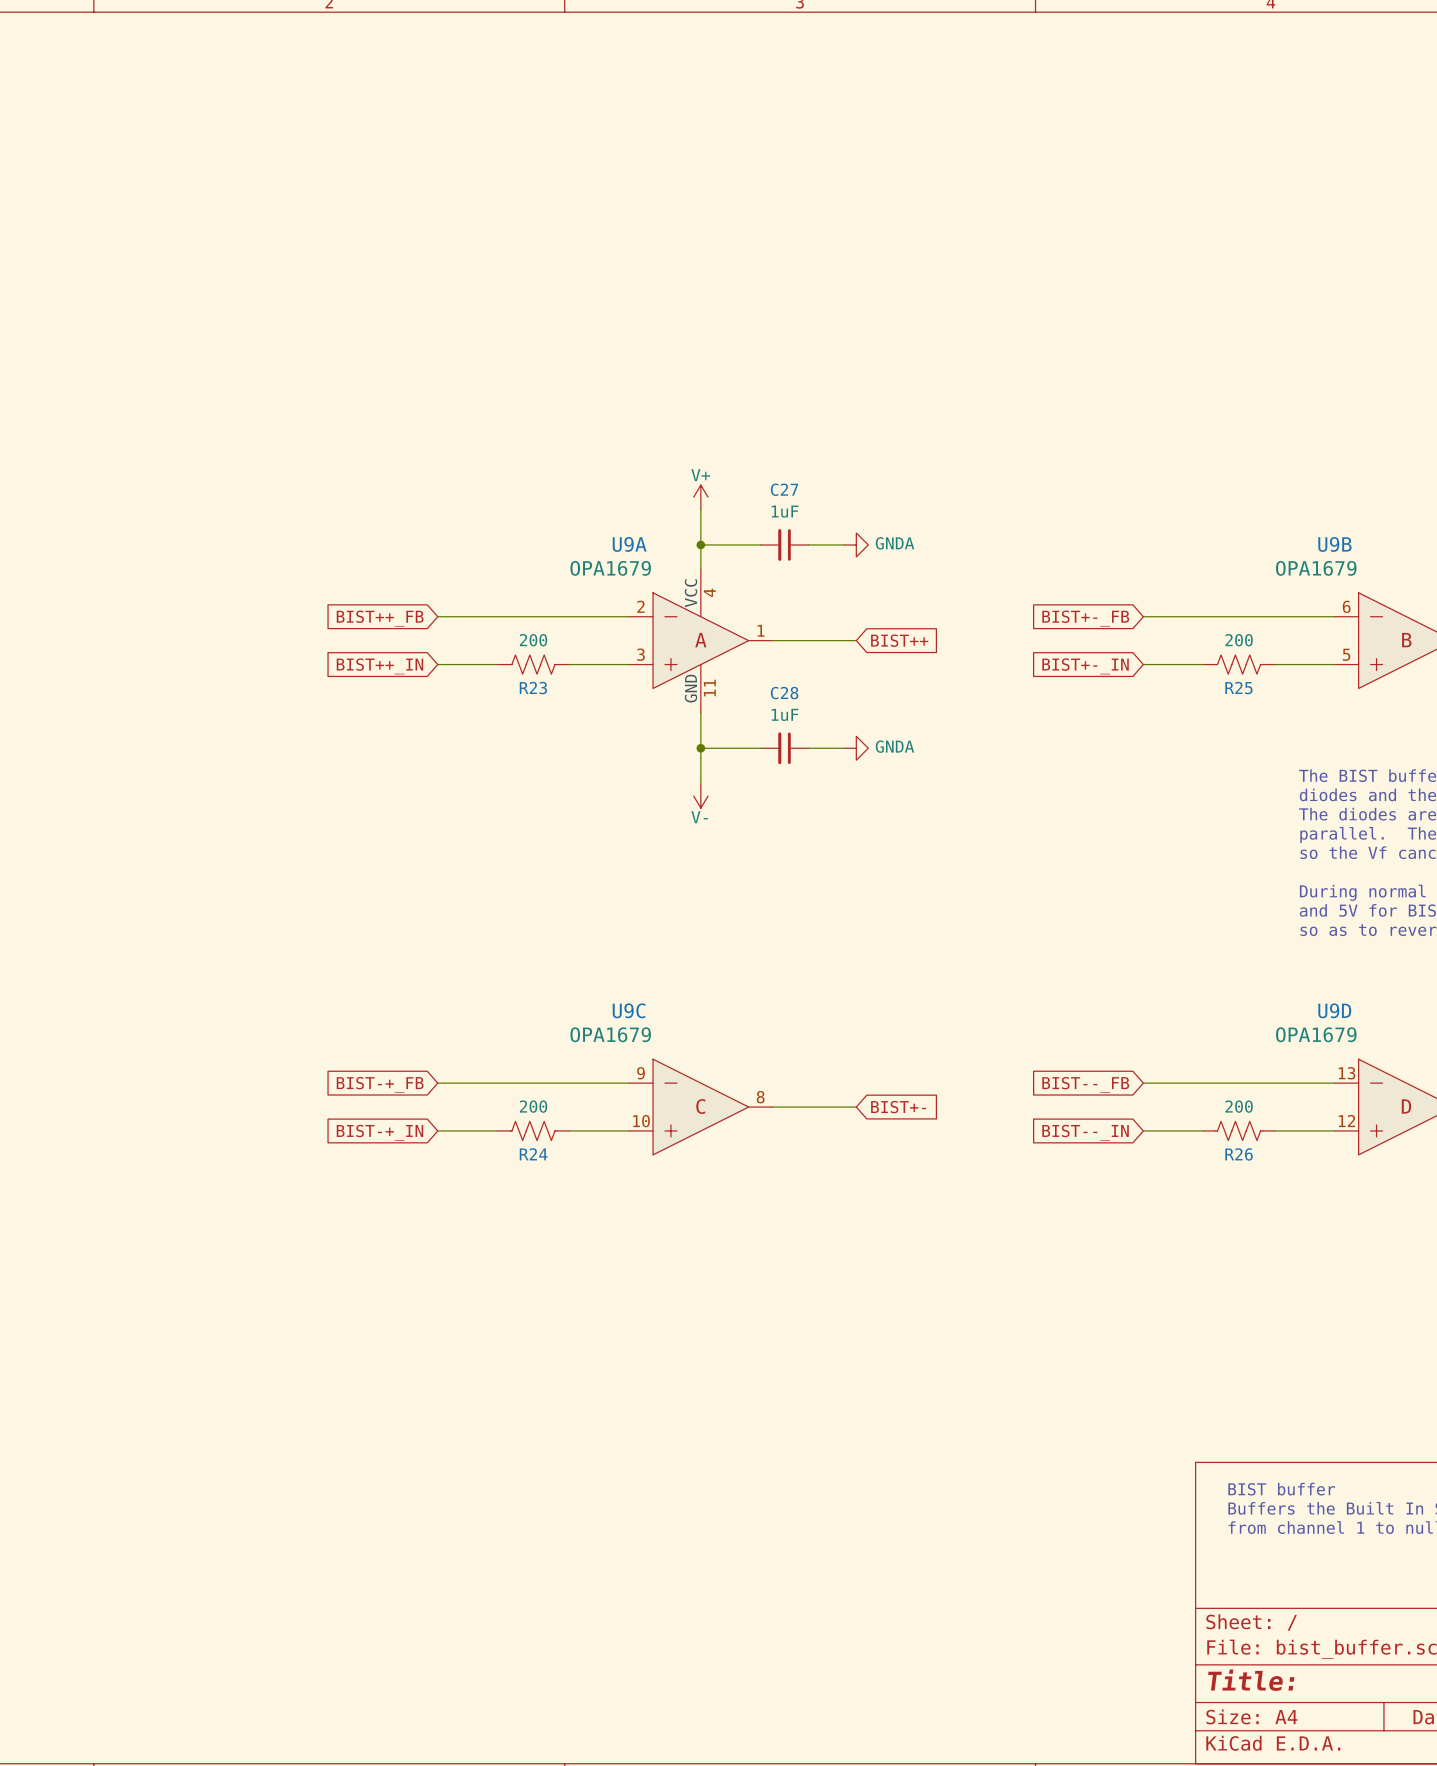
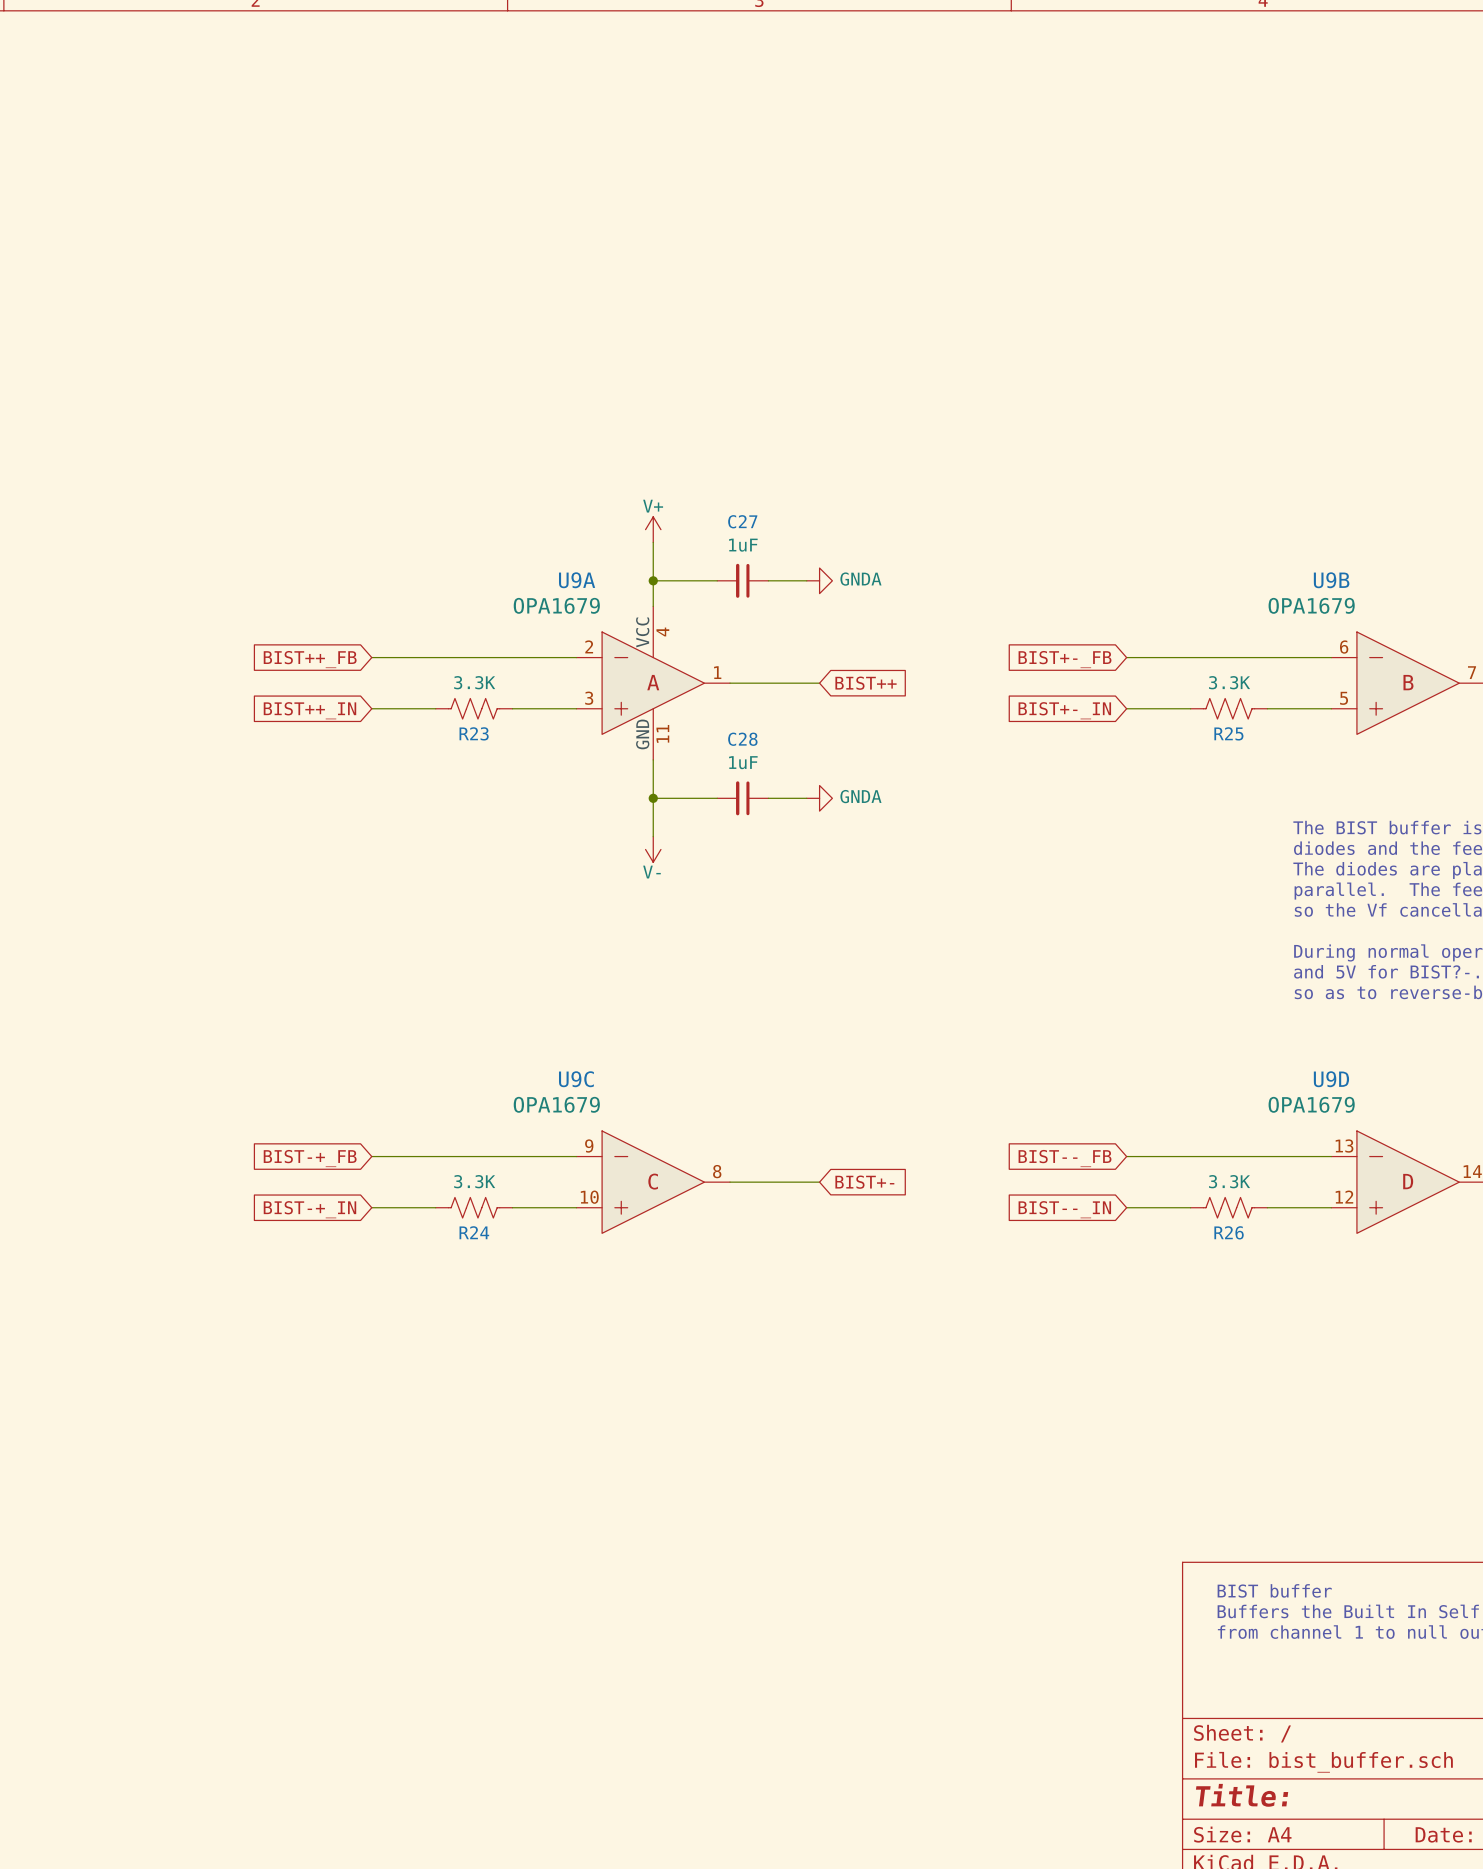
R23 value: 200 (533, 640) -> 3.3K (474, 682)
R25 value: 200 (1239, 640) -> 3.3K (1229, 682)
R24 value: 200 (533, 1106) -> 3.3K (474, 1181)
R26 value: 200 (1239, 1106) -> 3.3K (1229, 1181)

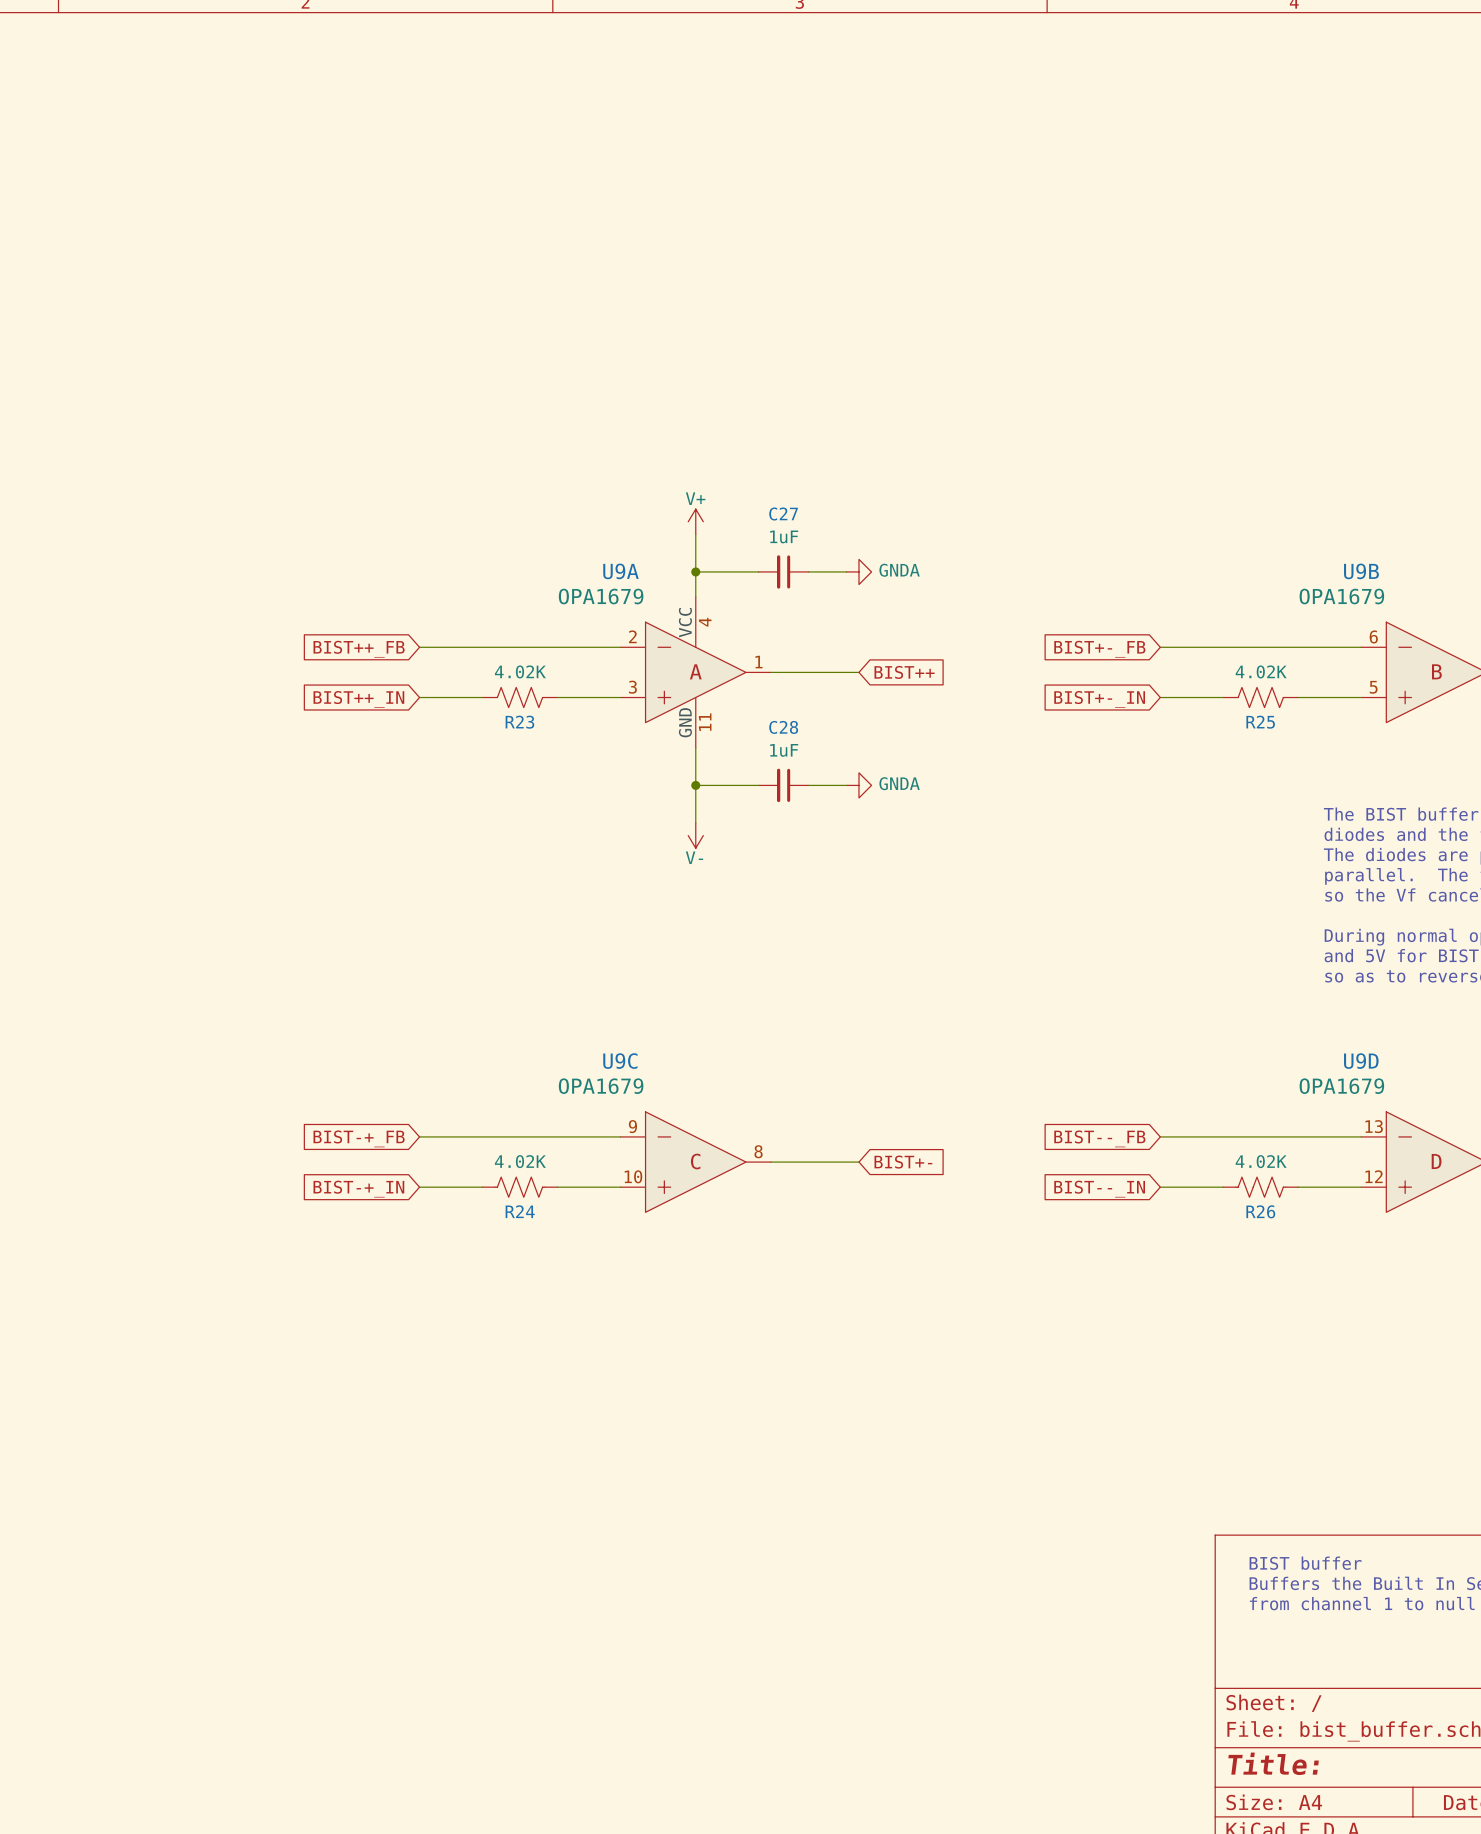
R23 value: 3.3K (474, 682) -> 4.02K (520, 671)
R25 value: 3.3K (1229, 682) -> 4.02K (1261, 671)
R24 value: 3.3K (474, 1181) -> 4.02K (520, 1161)
R26 value: 3.3K (1229, 1181) -> 4.02K (1261, 1161)

